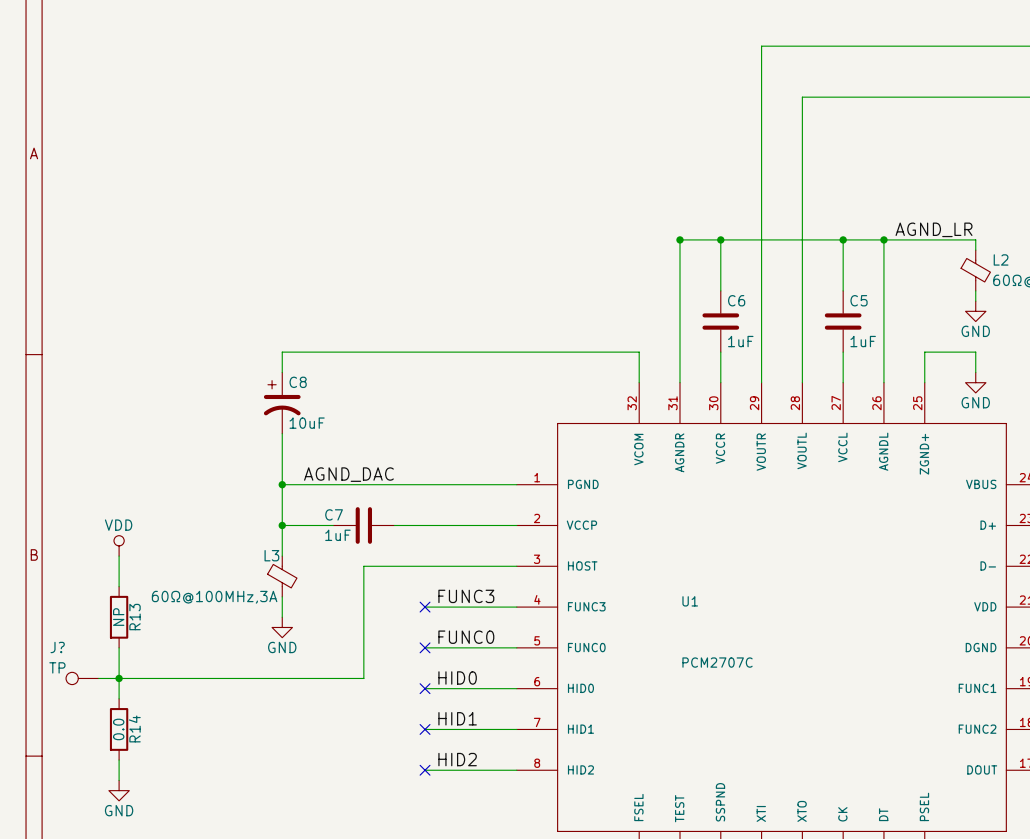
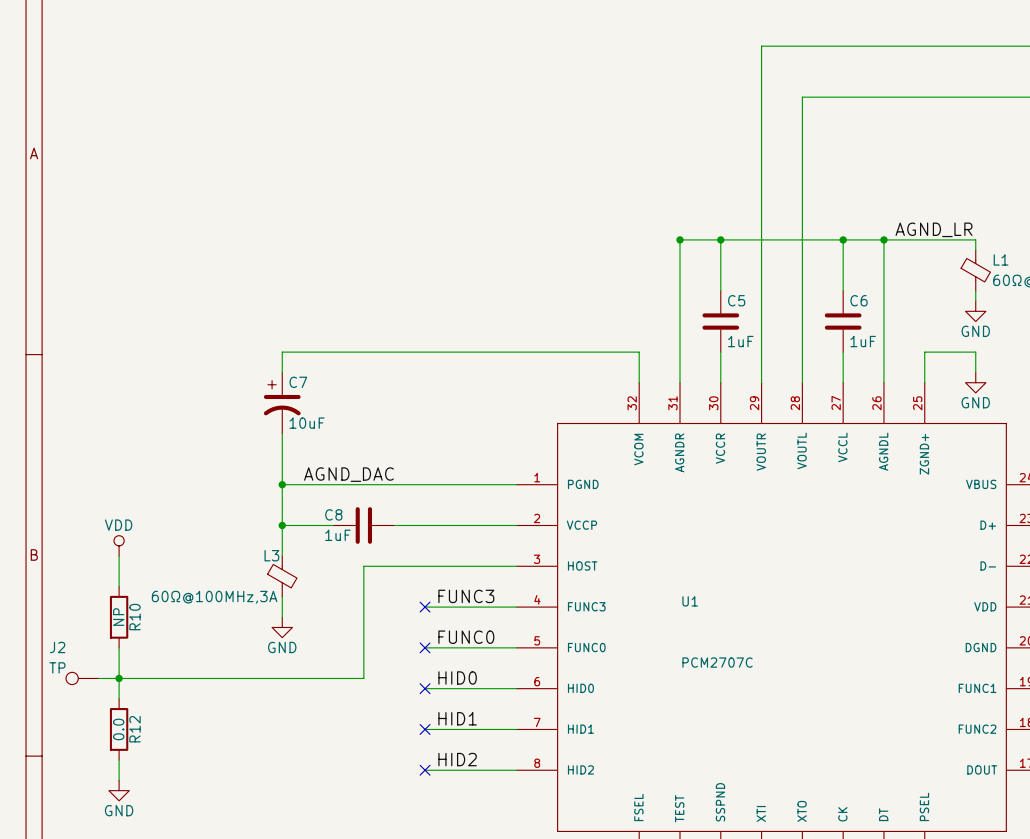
L2 name: L2 (1001, 259) -> L1 (1001, 259)
C6 name: C6 (736, 300) -> C5 (736, 300)
C5 name: C5 (859, 300) -> C6 (859, 300)
C8 name: C8 (298, 382) -> C7 (298, 382)
C7 name: C7 (334, 514) -> C8 (333, 514)
R13 name: R13 (135, 617) -> R10 (135, 617)
J? name: J? (57, 647) -> J2 (57, 647)
R14 name: R14 (134, 728) -> R12 (135, 729)

